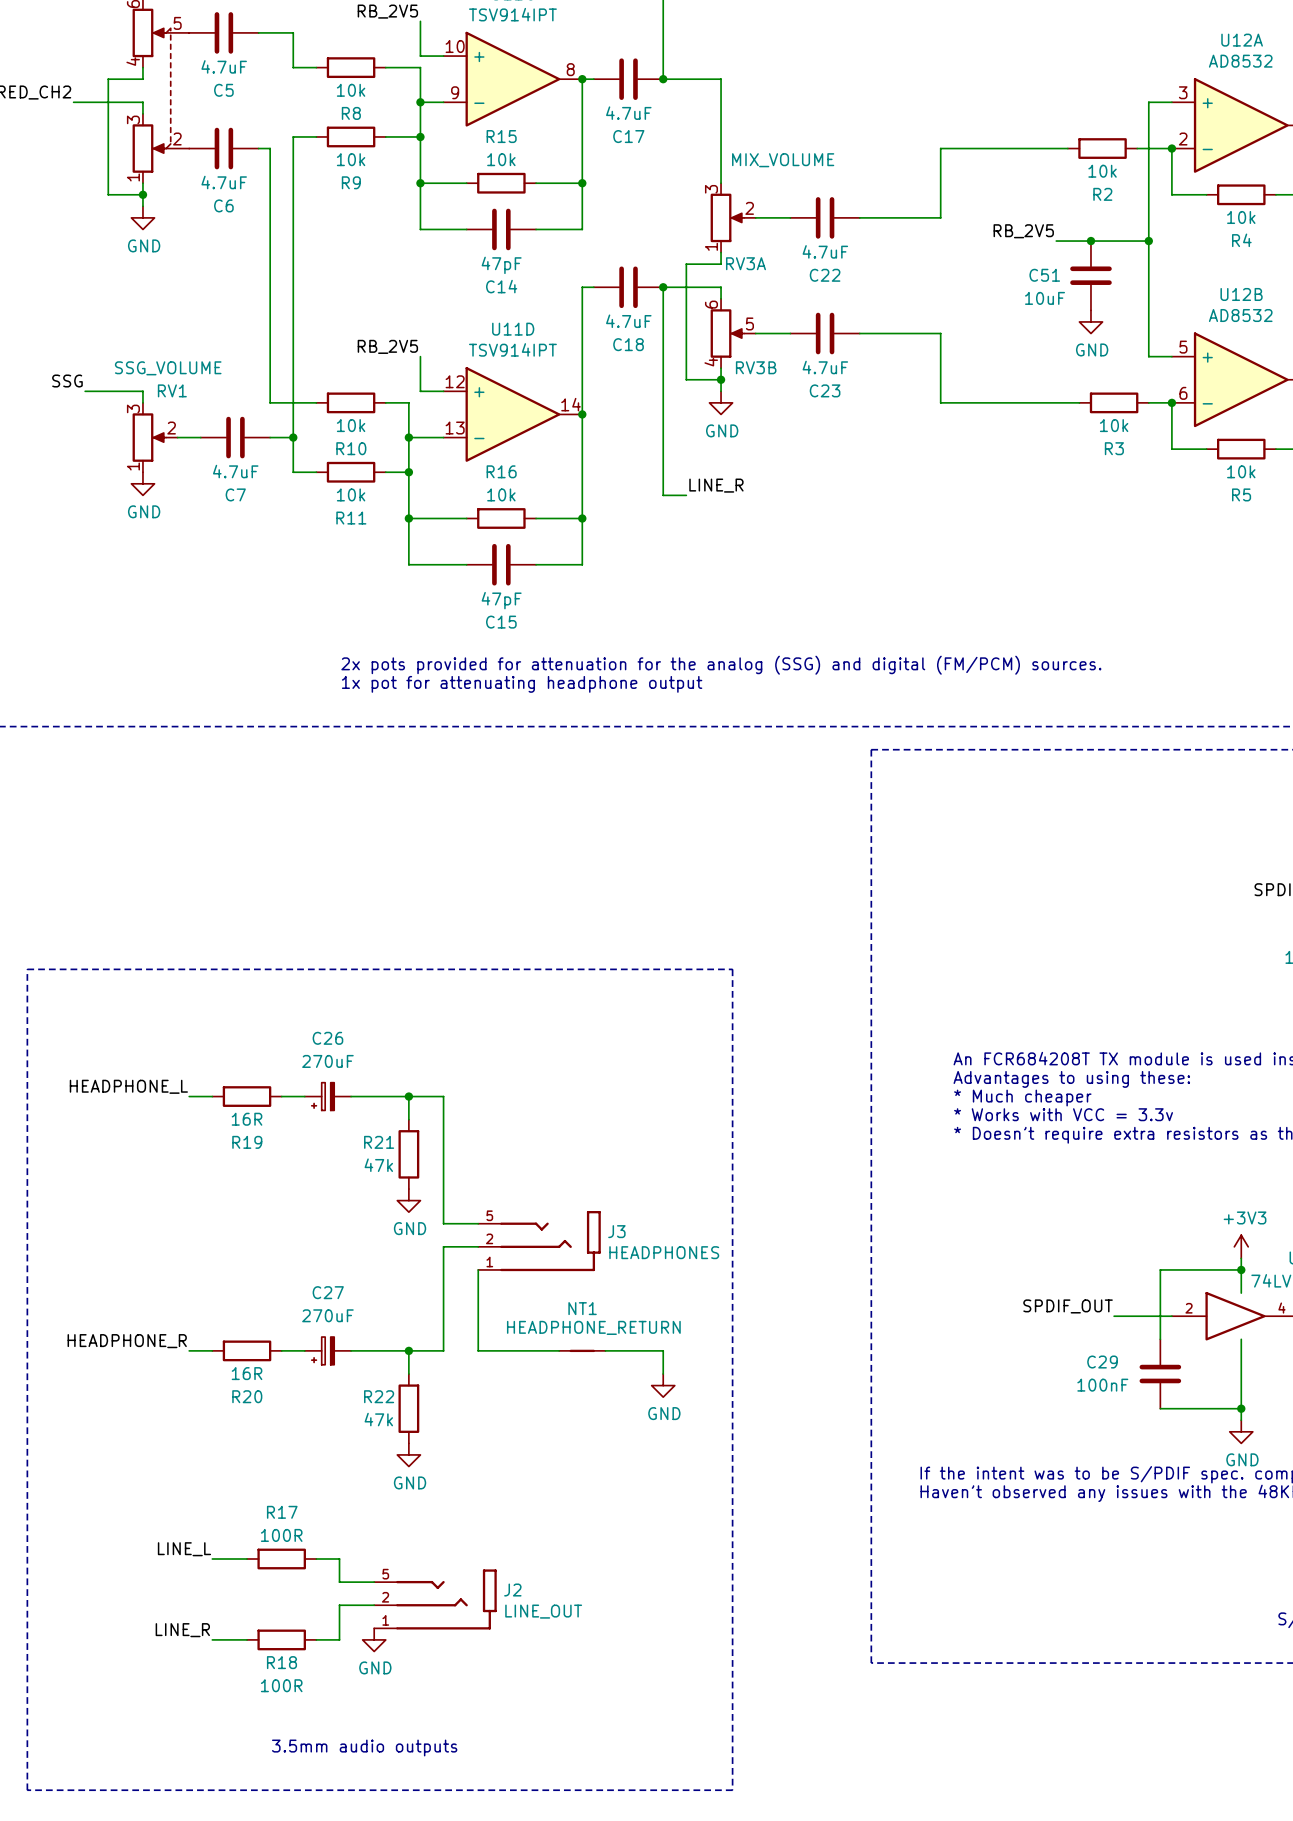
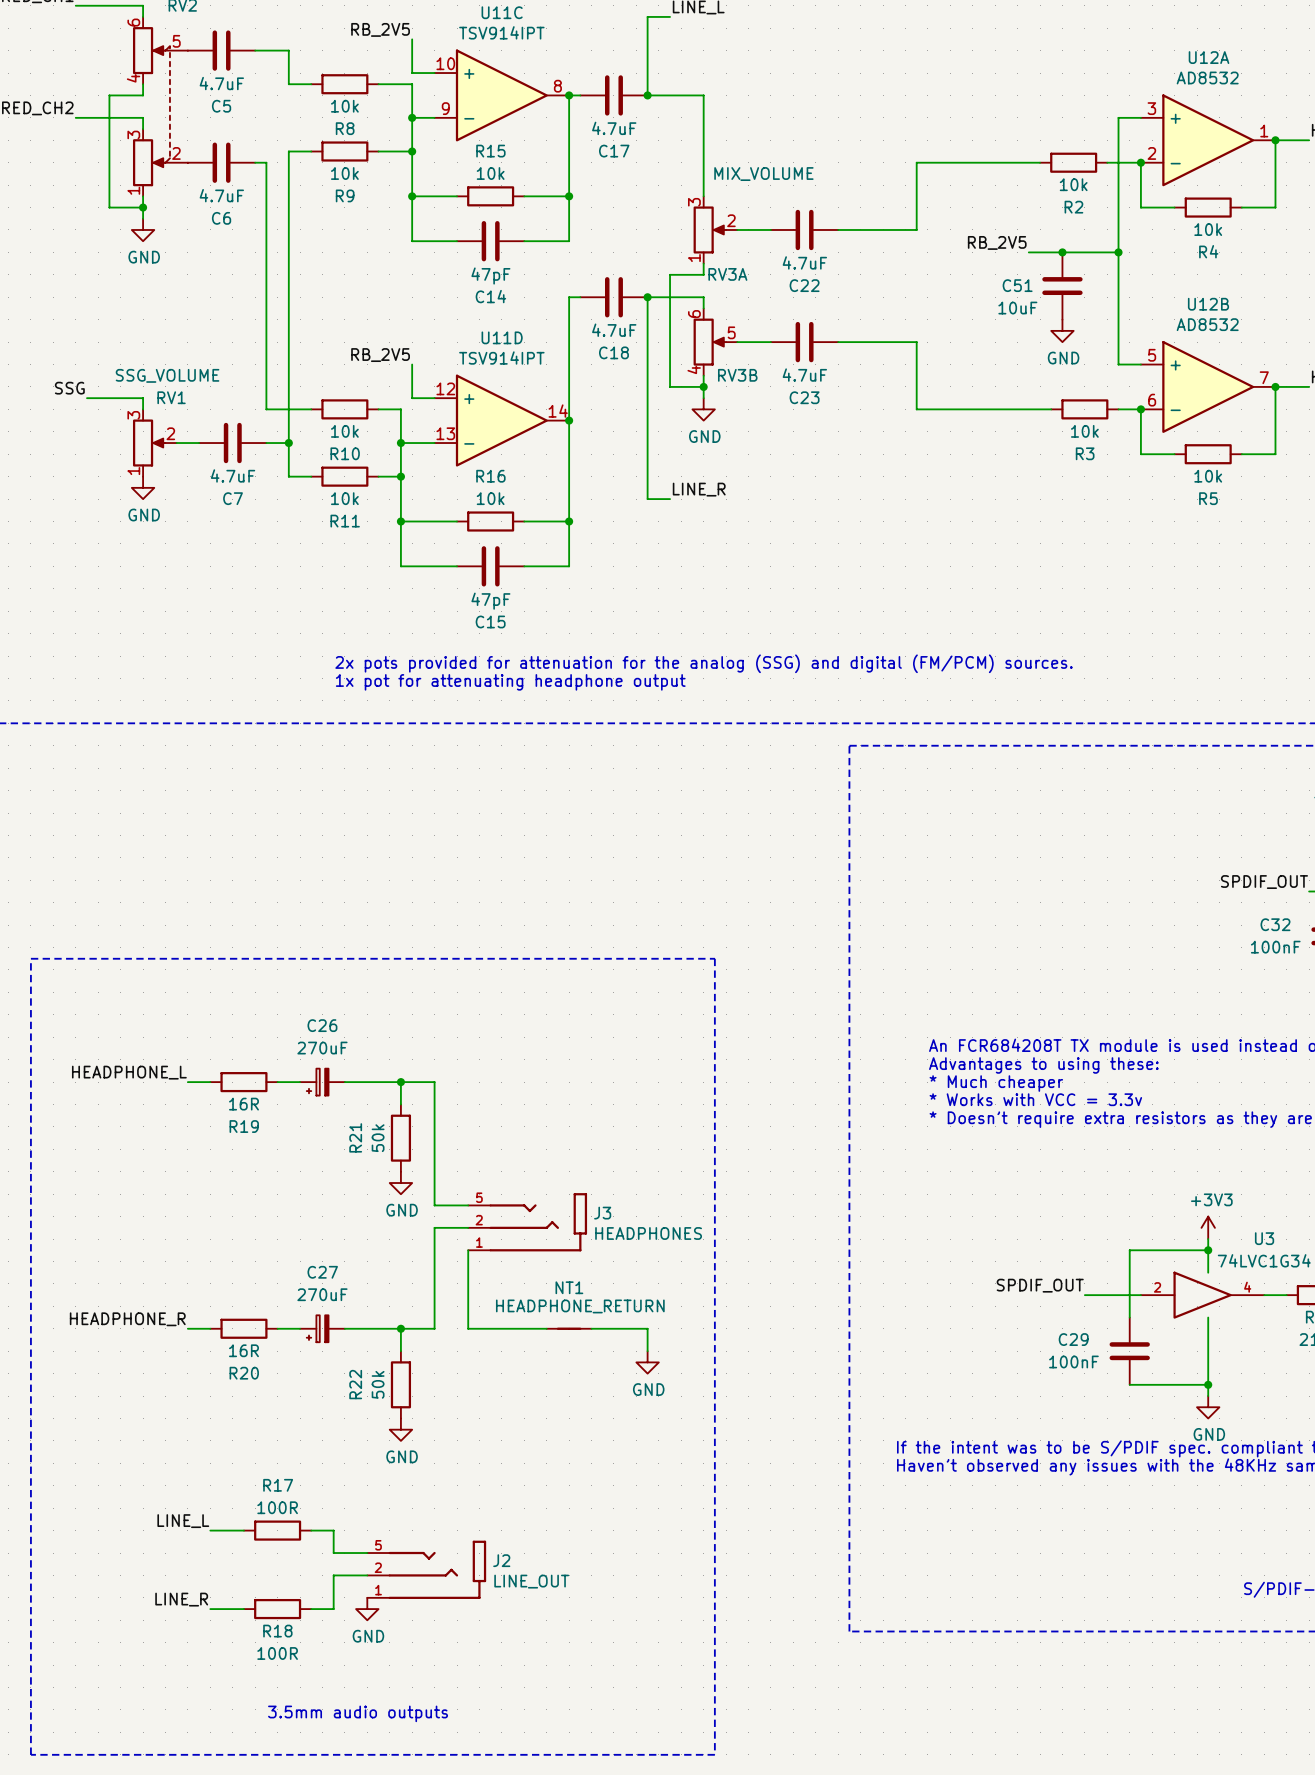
R21 name rotation: 0° (379, 1142) -> 90° counterclockwise (355, 1137)
R21 value: 47k (378, 1165) -> 50k (378, 1138)
R22 name rotation: 0° (379, 1396) -> 90° counterclockwise (355, 1384)
R22 value: 47k (378, 1419) -> 50k (378, 1384)

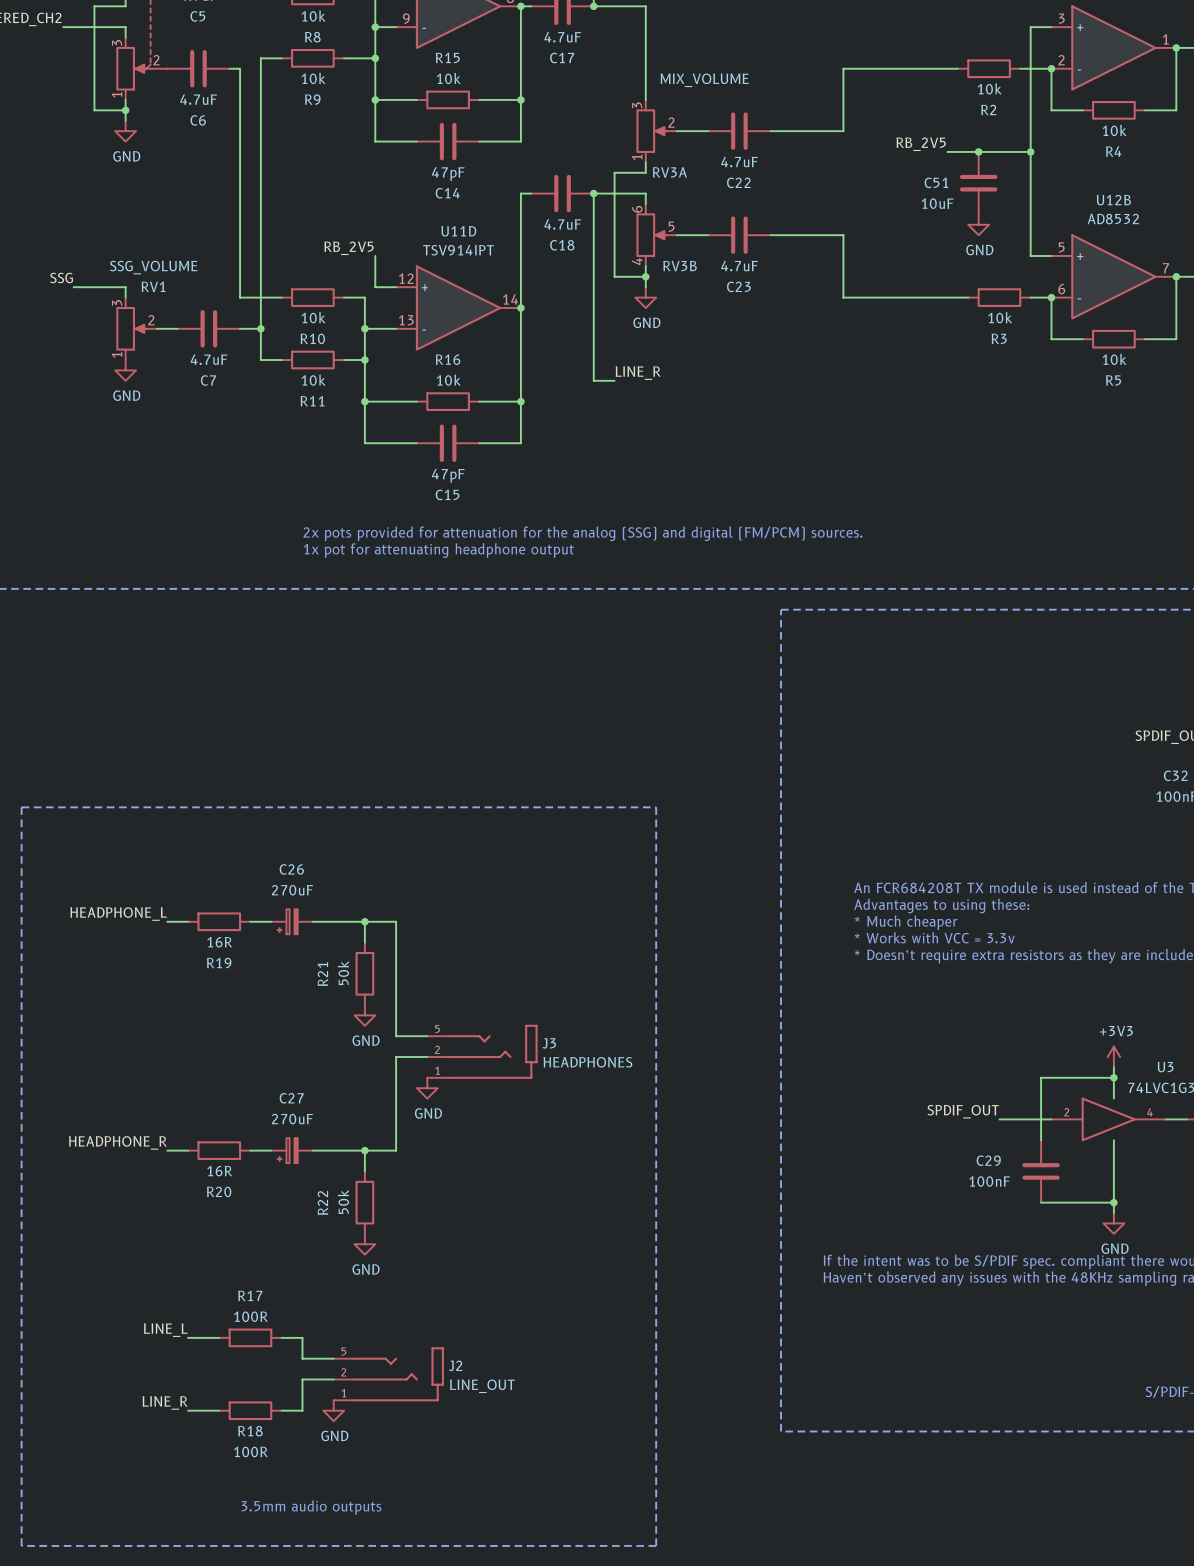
wire: (468, 1250) (468, 1328) (546, 1328) -> none
NT1: HEADPHONE_RETURN (569, 1328) -> none
wire: (591, 1328) (647, 1328) (647, 1351) -> none
power symbol position: GND (647, 1362) -> GND (427, 1088)

